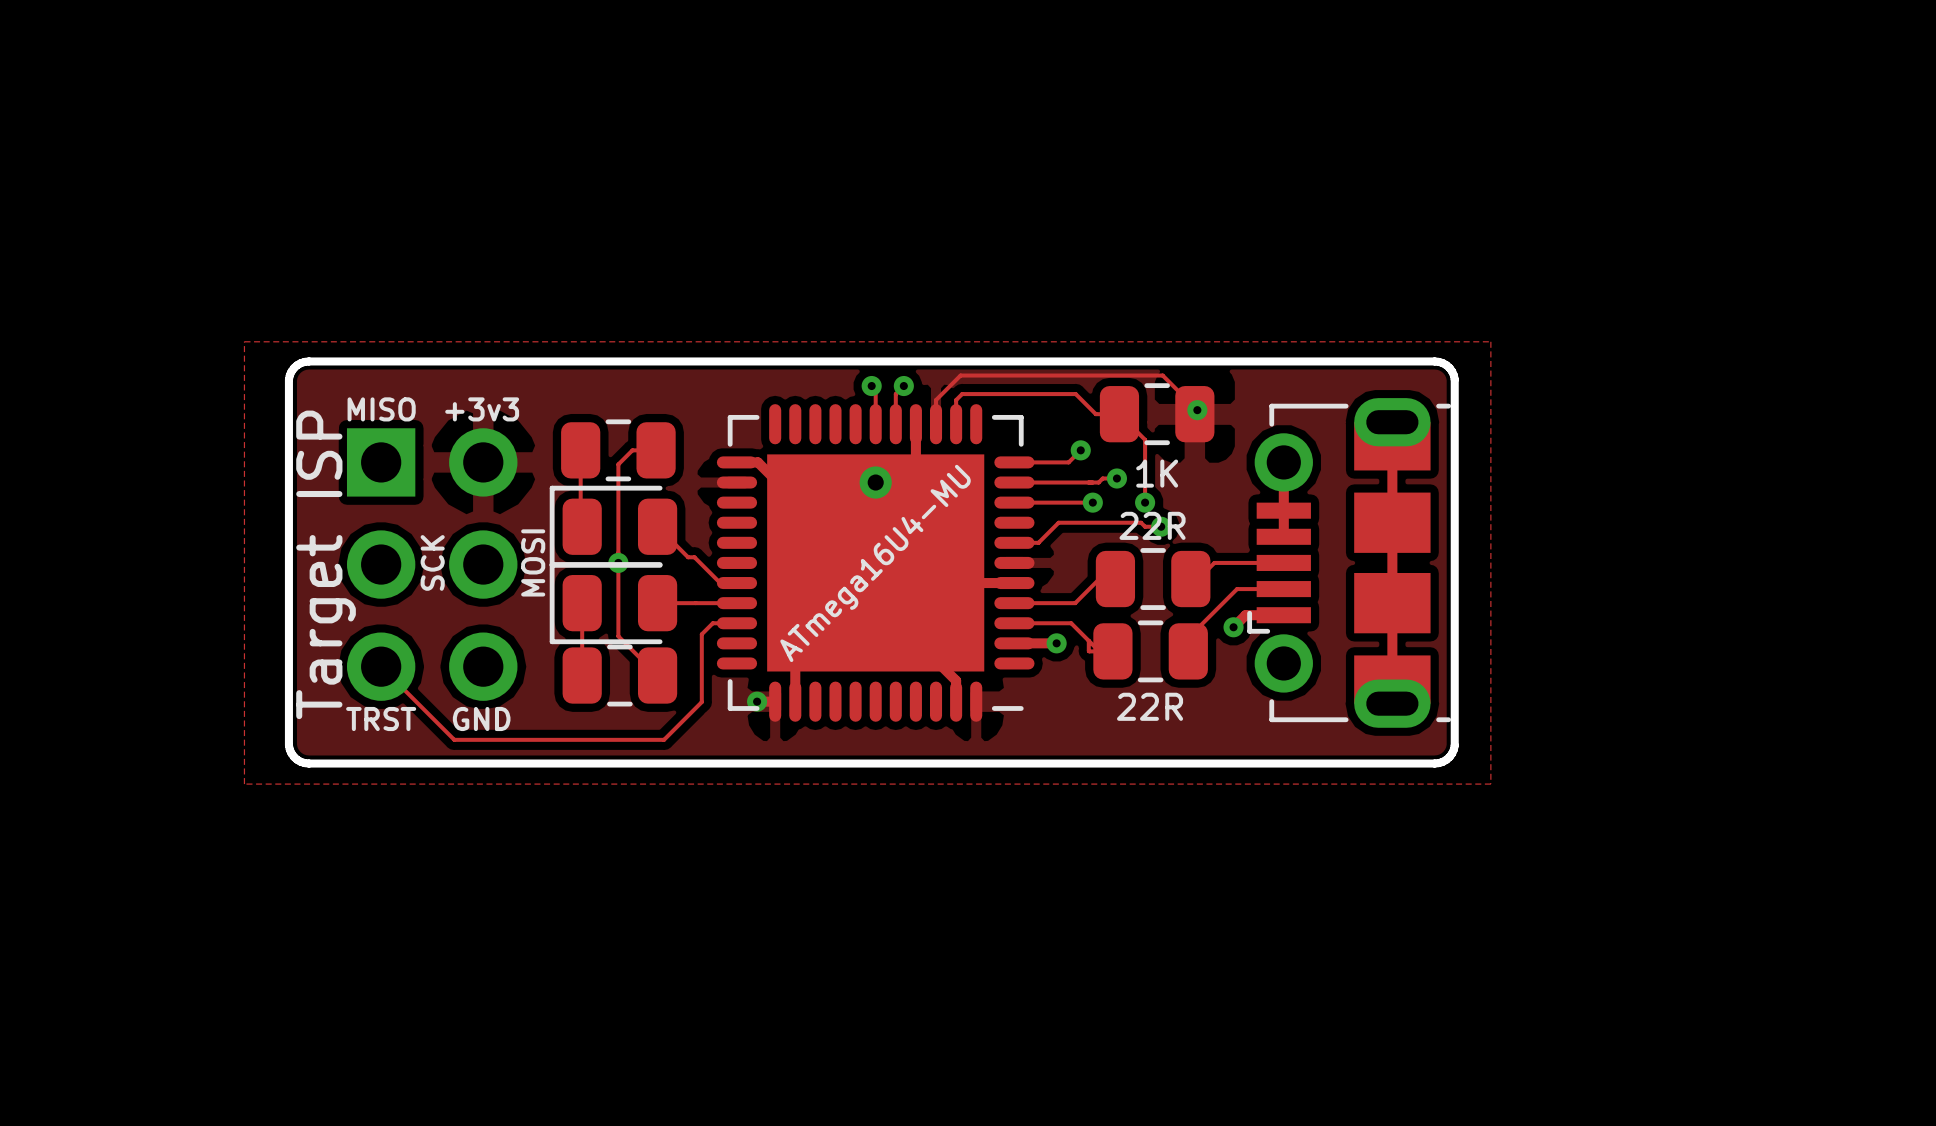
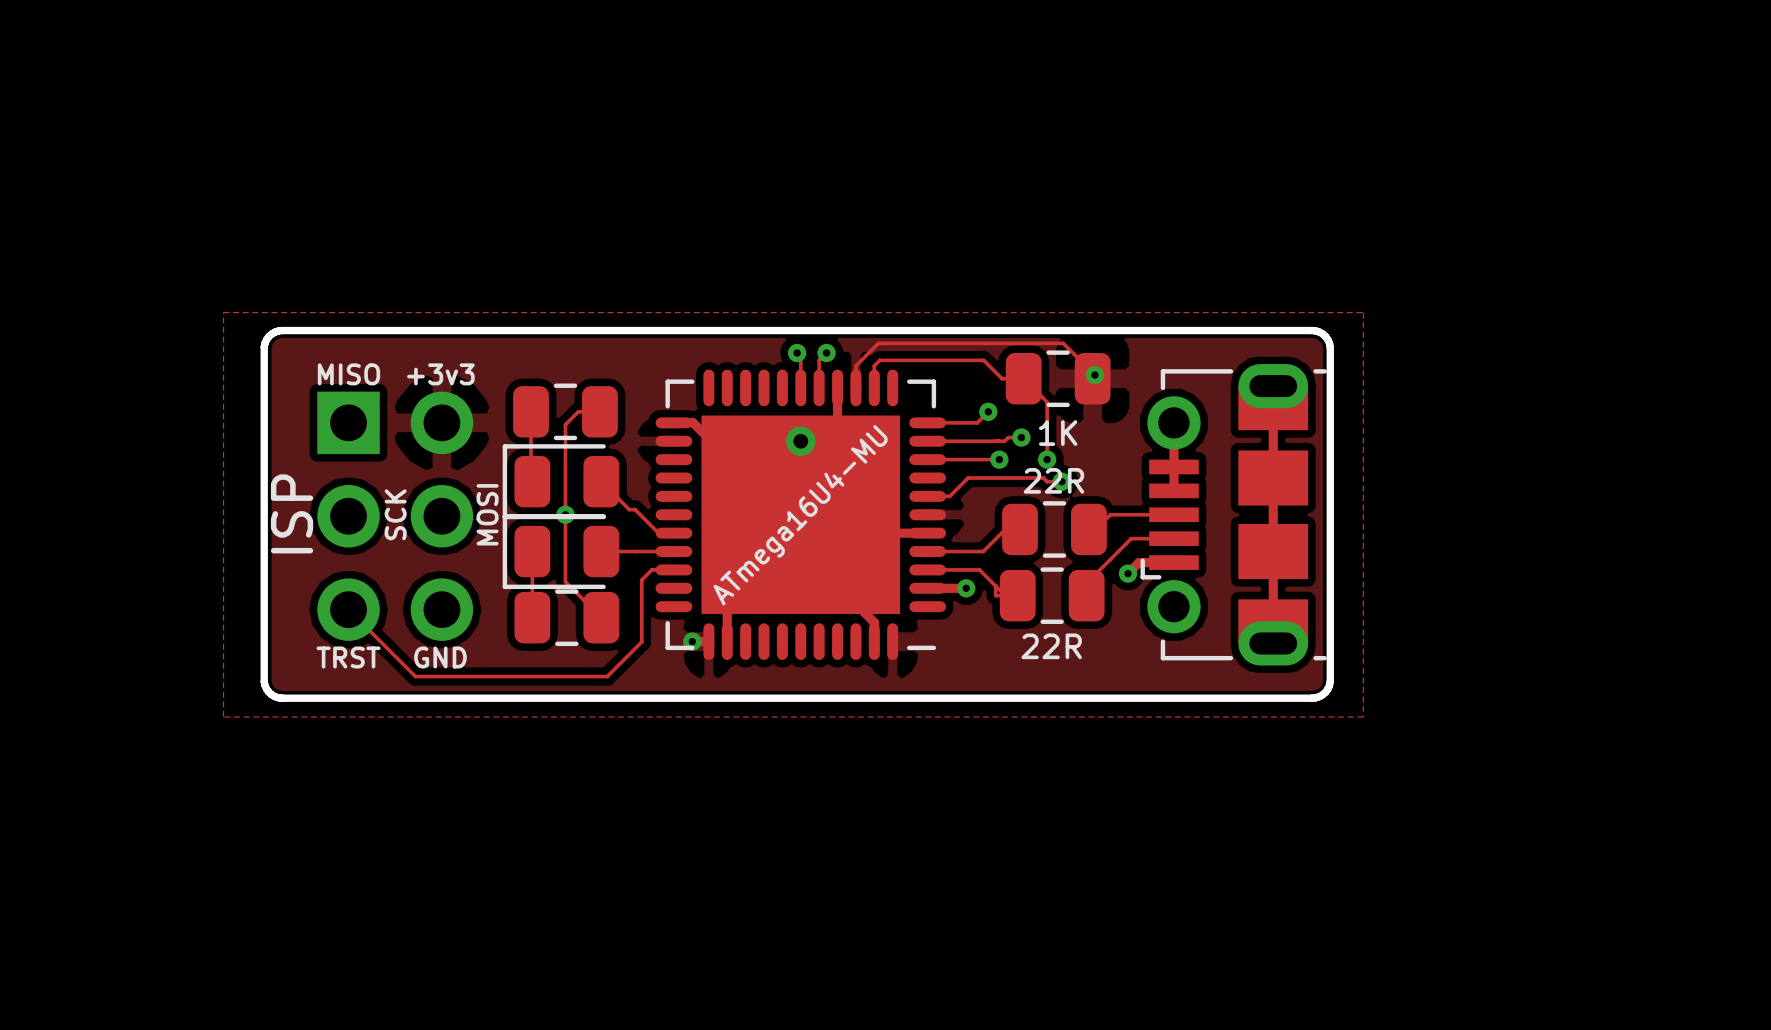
part value: Target ISP (326, 564) -> ISP (292, 513)

